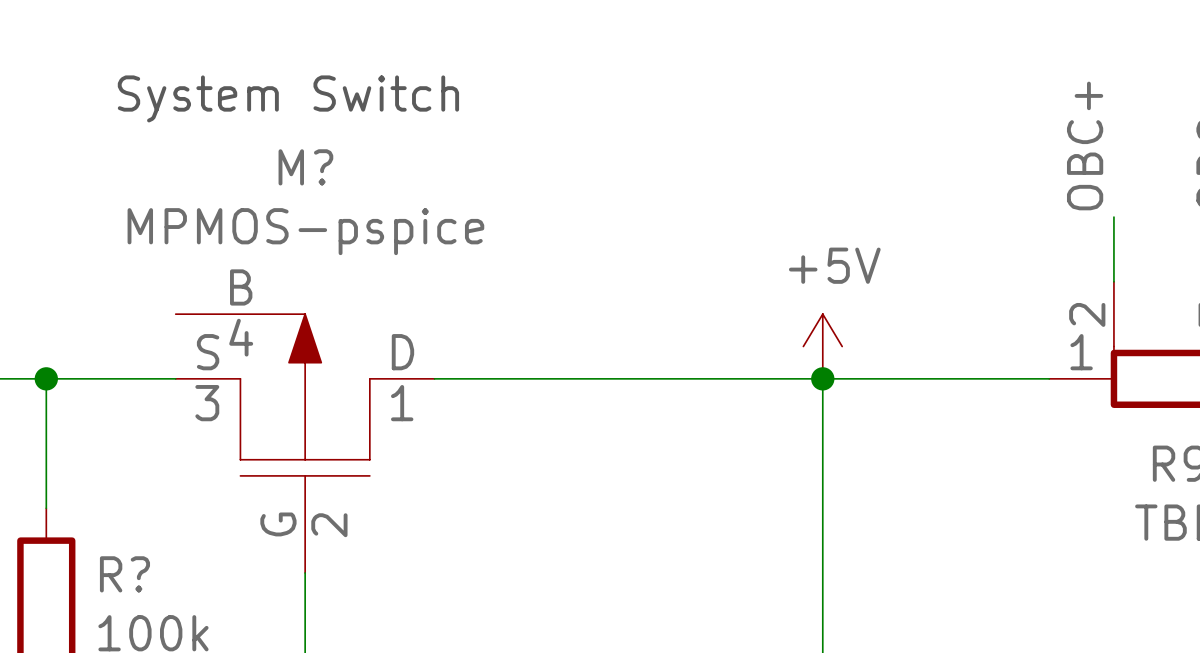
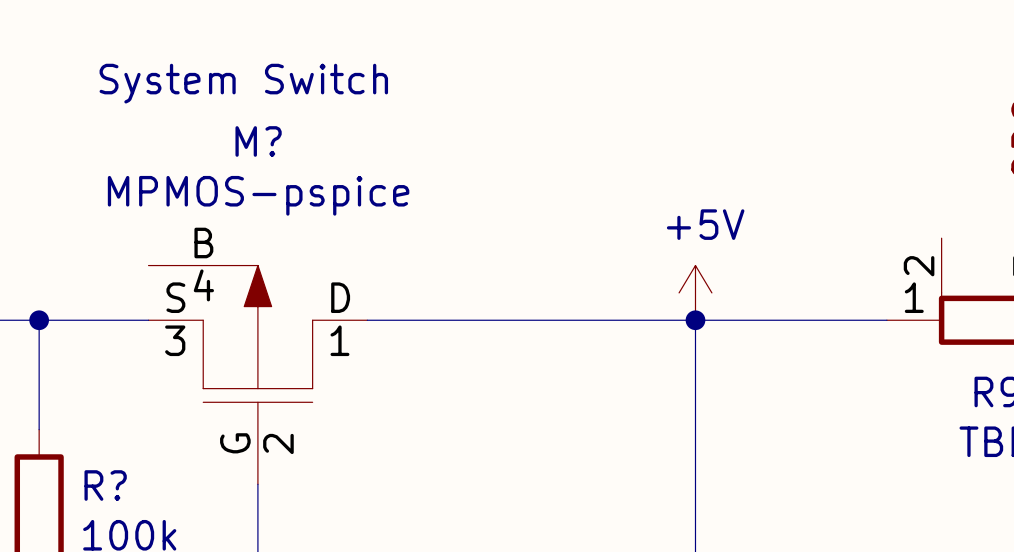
label: OBC+ (1085, 145) -> none
wire: (1113, 217) (1113, 281) -> none

